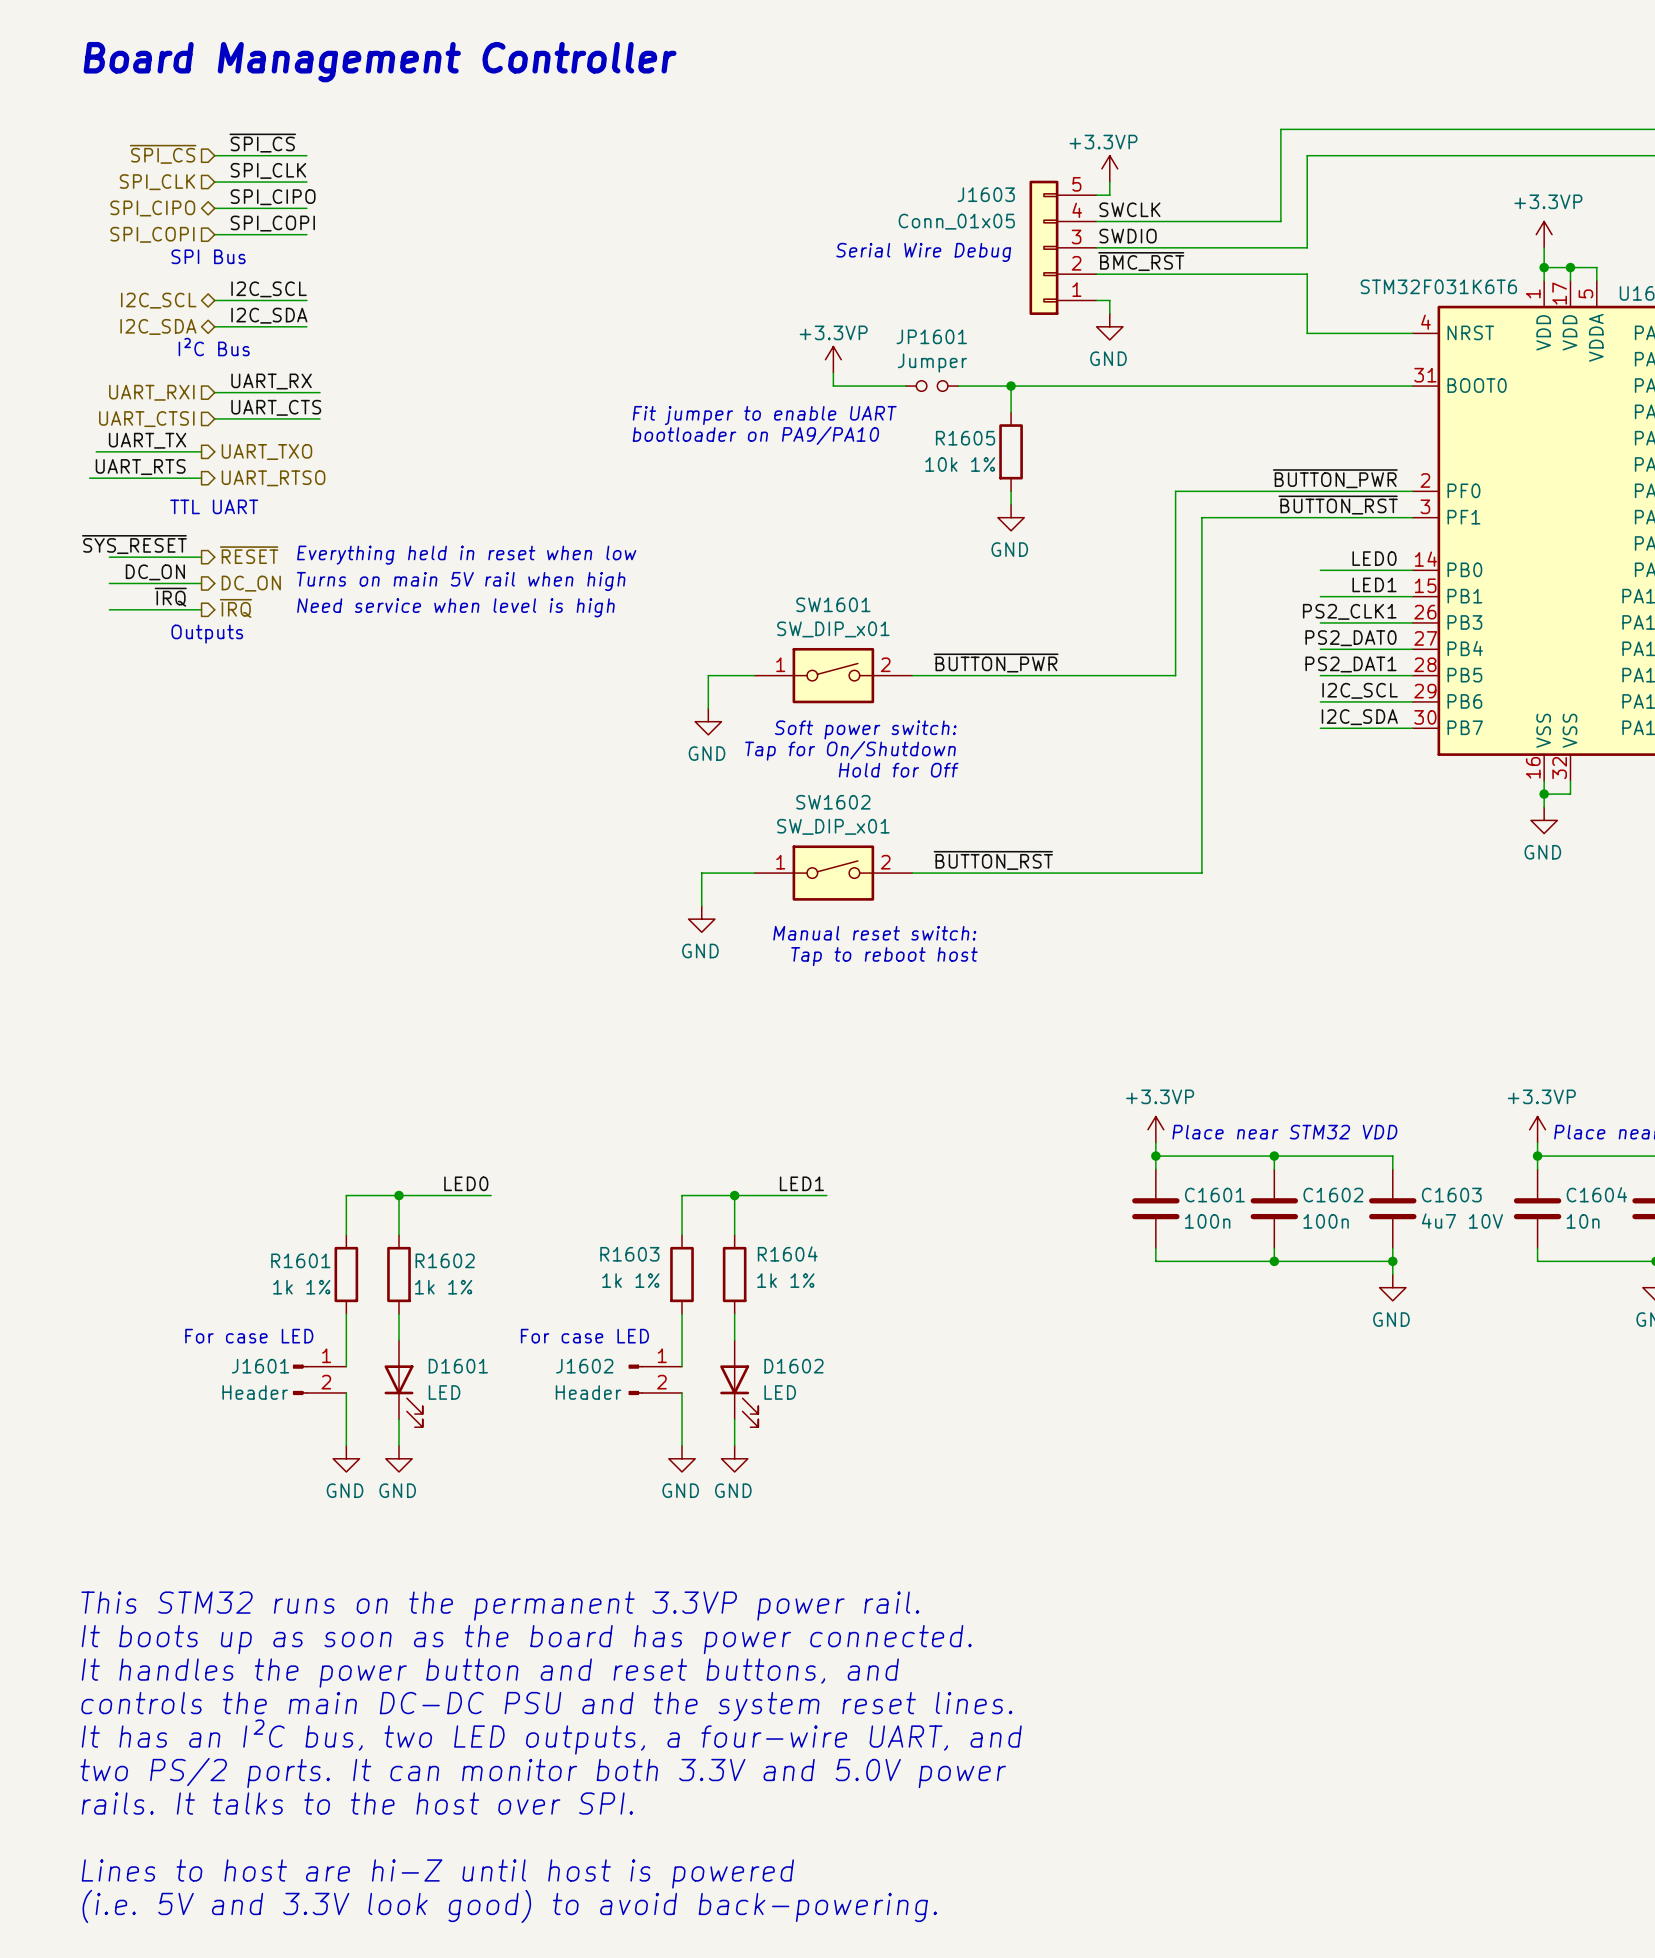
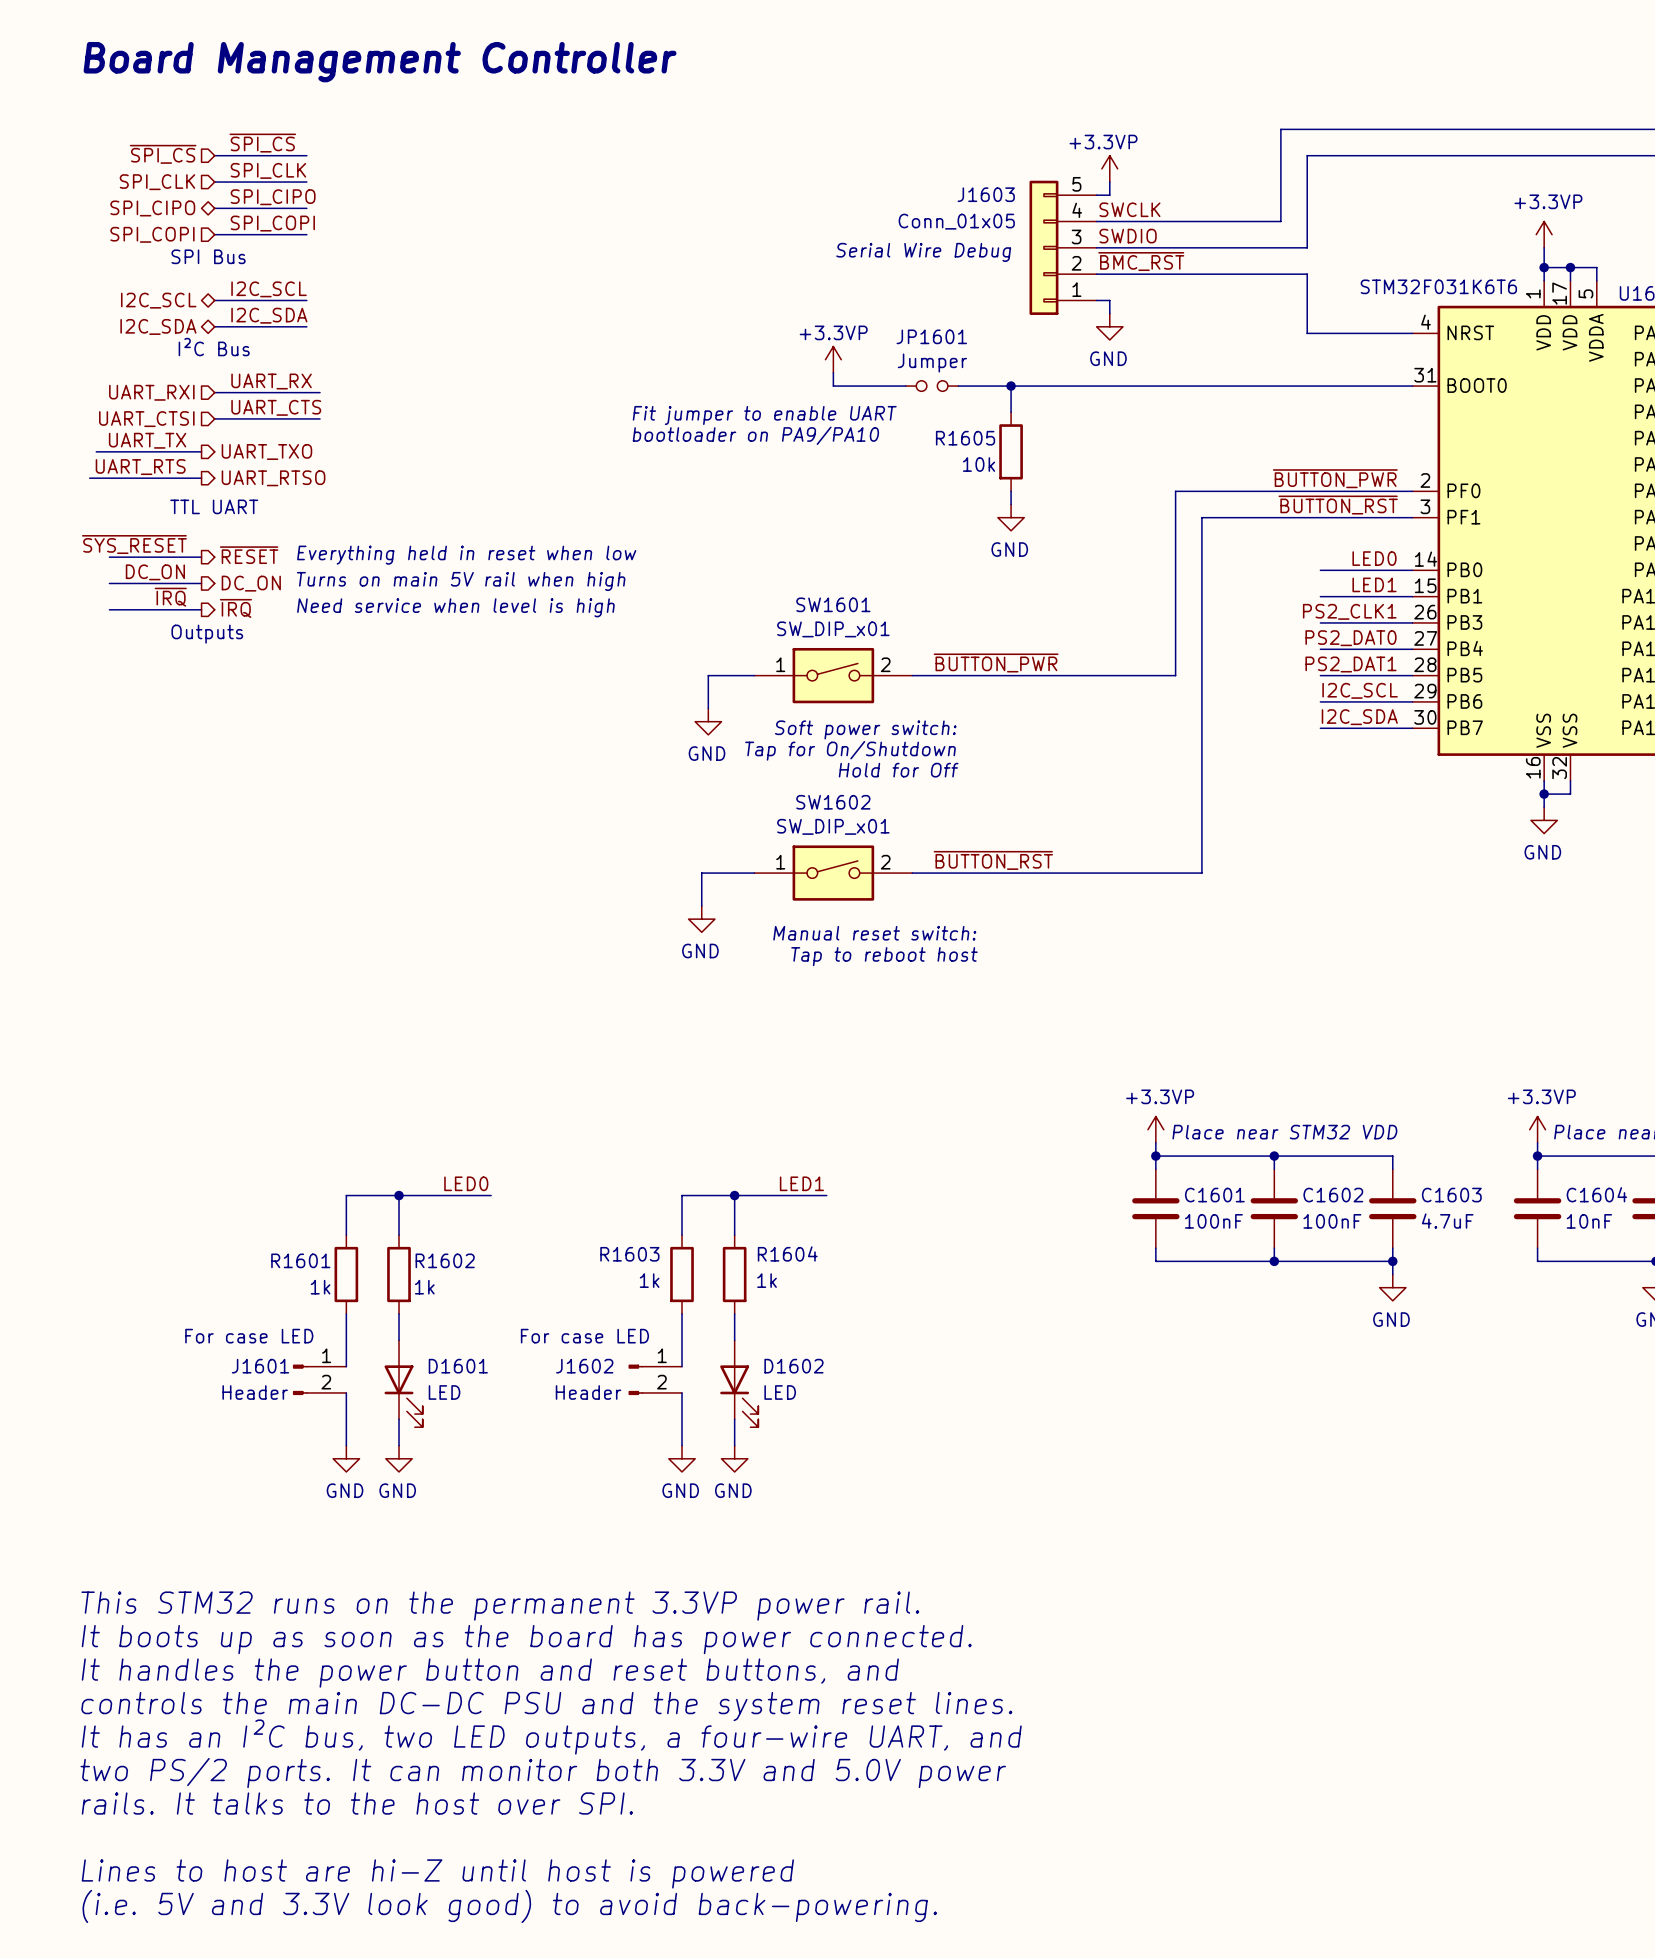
R1605 value: 10k 1% (960, 464) -> 10k (979, 464)
C1601 value: 100n (1207, 1221) -> 100nF (1213, 1221)
C1602 value: 100n (1326, 1221) -> 100nF (1332, 1221)
C1603 value: 4u7 10V (1462, 1221) -> 4.7uF (1447, 1221)
C1604 value: 10n (1583, 1221) -> 10nF (1589, 1221)
R1603 value: 1k 1% (630, 1280) -> 1k (649, 1280)
R1604 value: 1k 1% (785, 1280) -> 1k (767, 1280)
R1601 value: 1k 1% (301, 1287) -> 1k (320, 1287)
R1602 value: 1k 1% (443, 1287) -> 1k (424, 1287)

